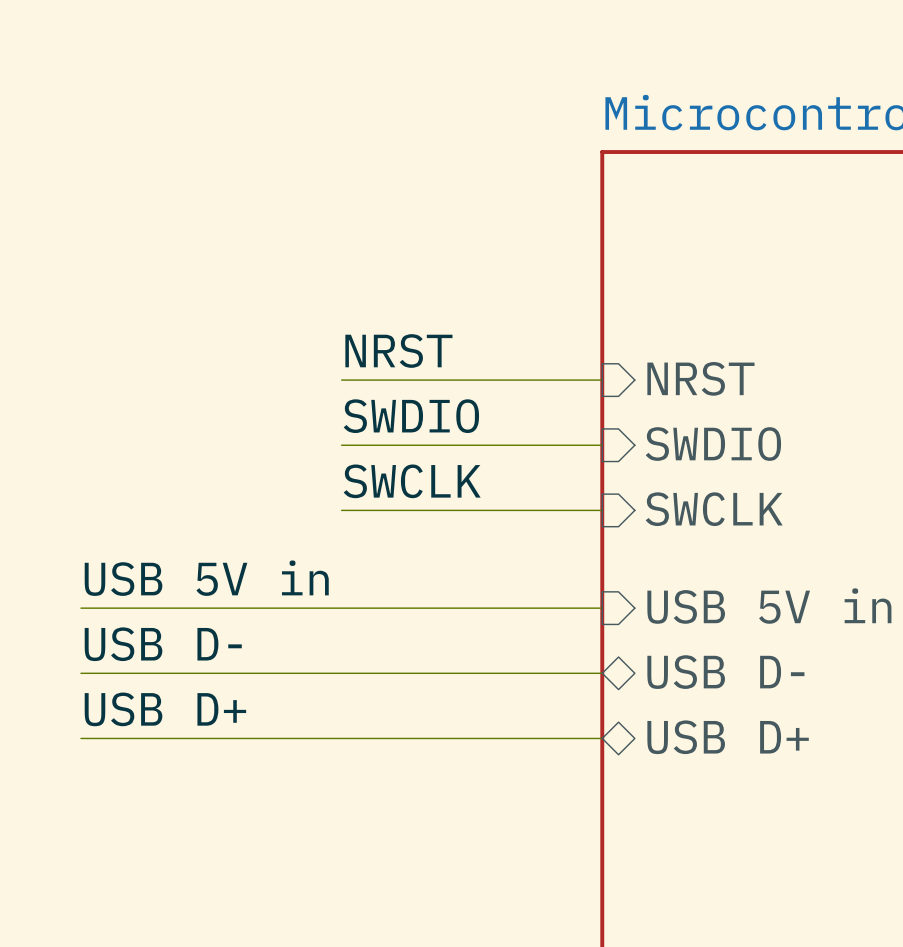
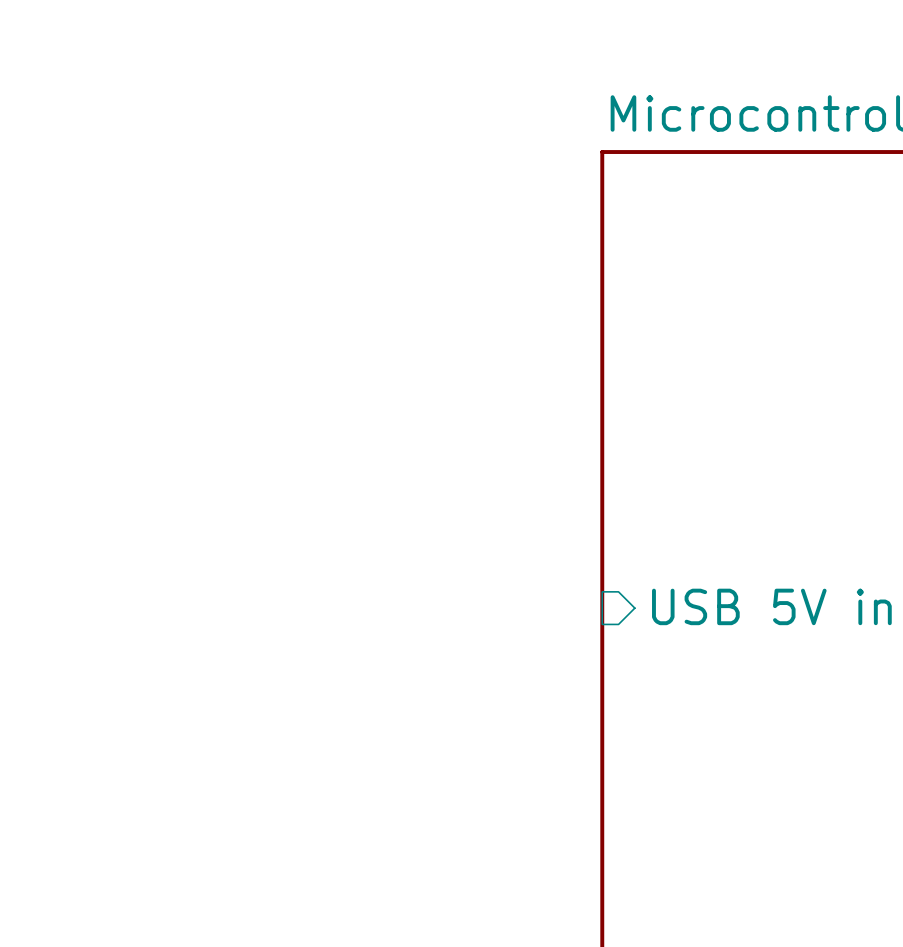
label: NRST (398, 351) -> none
sheet pin: NRST (700, 378) -> none
wire: (341, 380) (602, 380) -> none
label: SWDIO (411, 416) -> none
sheet pin: SWDIO (713, 444) -> none
wire: (341, 445) (602, 445) -> none
label: SWCLK (412, 481) -> none
sheet pin: SWCLK (714, 509) -> none
wire: (341, 510) (602, 510) -> none
label: USB 5V in (206, 578) -> none
wire: (80, 608) (602, 608) -> none
label: USB D- (163, 644) -> none
sheet pin: USB D- (725, 672) -> none
wire: (80, 673) (602, 673) -> none
label: USB D+ (165, 709) -> none
sheet pin: USB D+ (728, 737) -> none
wire: (80, 738) (602, 738) -> none

